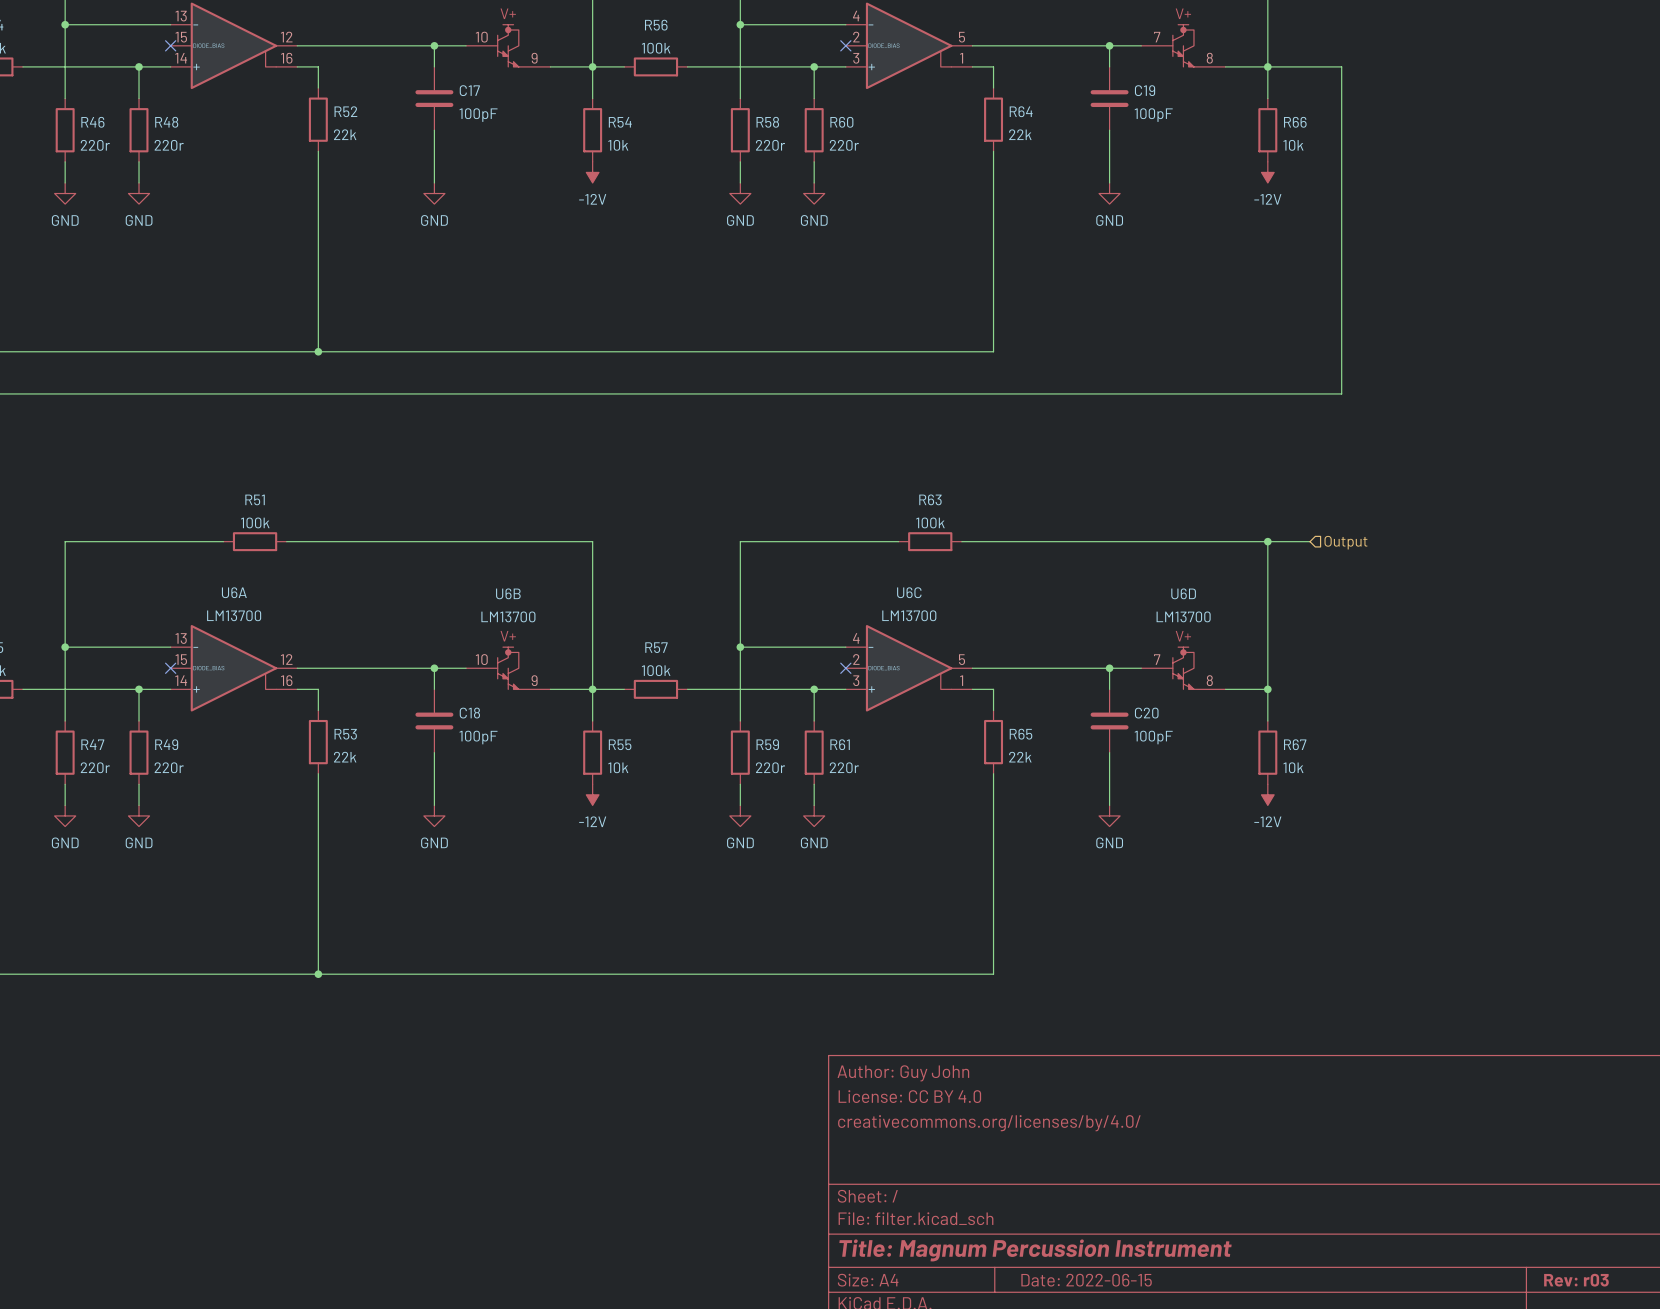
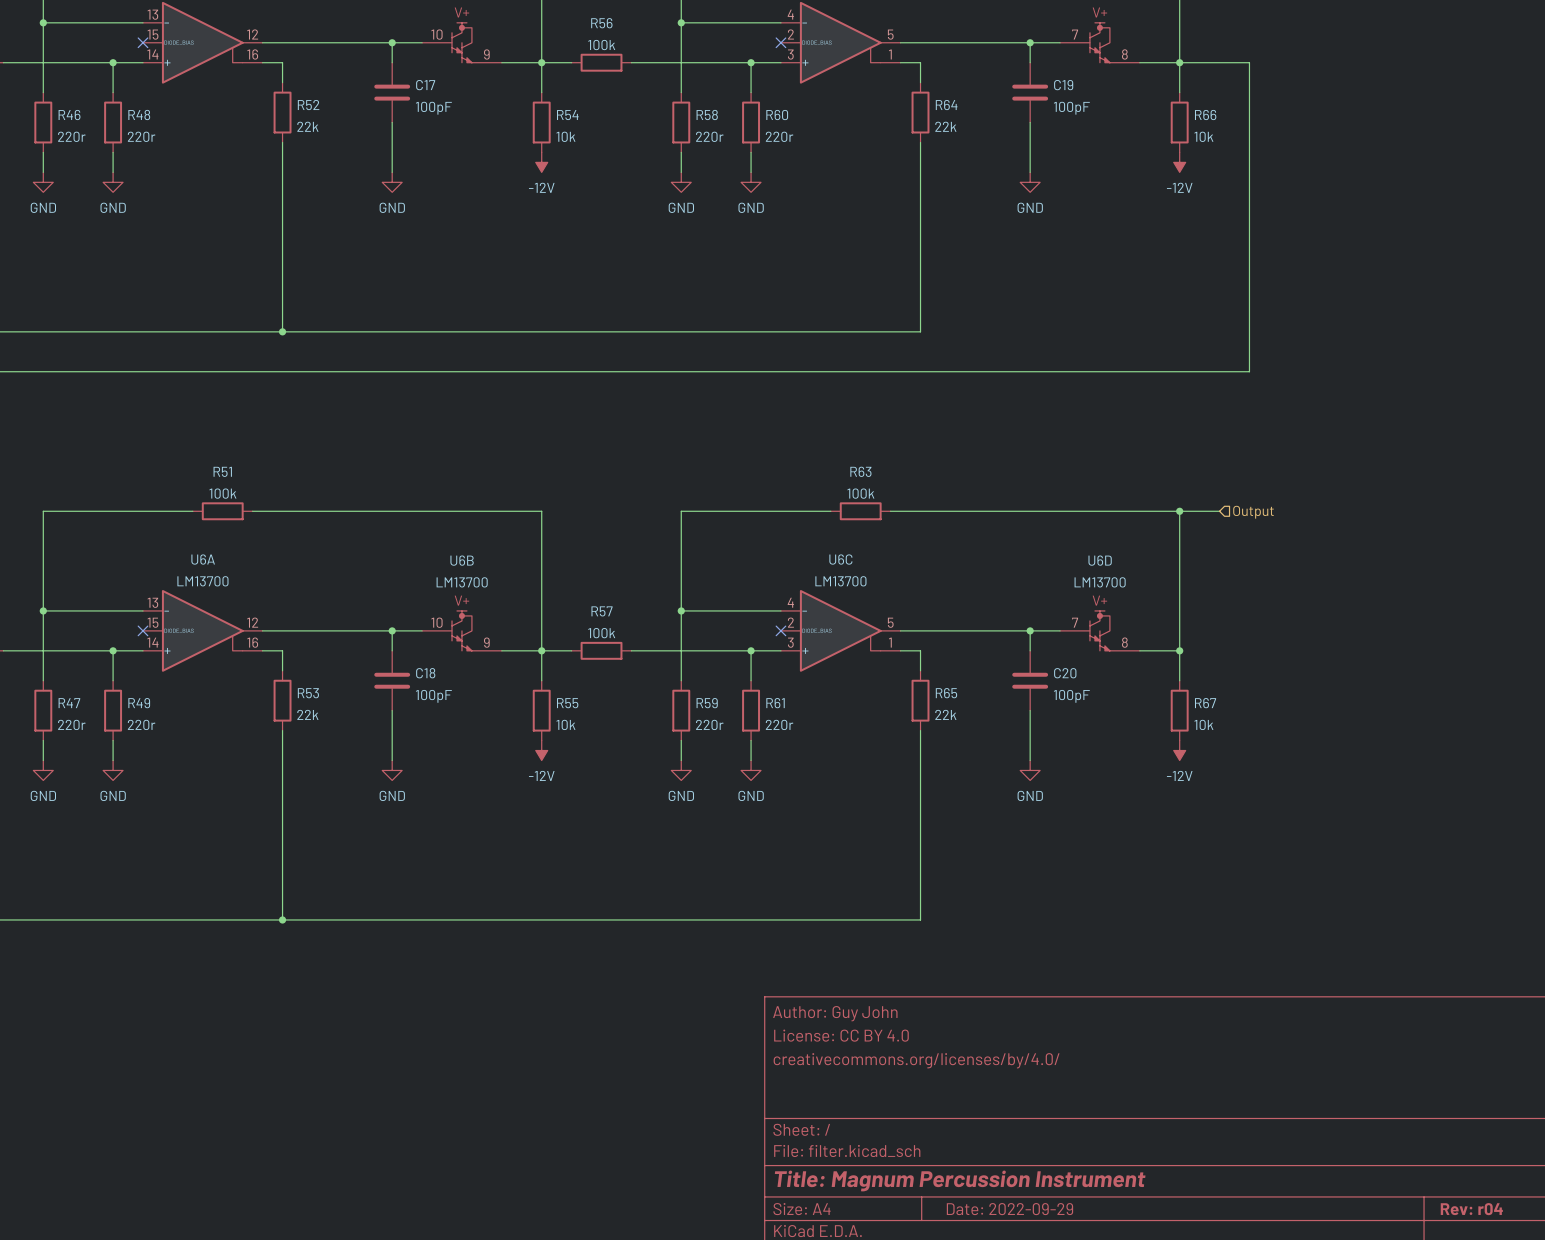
title block: Date: 2022-06-15 (1086, 1280) -> Date: 2022-09-29 (1009, 1209)
title block: Rev: r03 (1576, 1280) -> Rev: r04 (1471, 1209)

